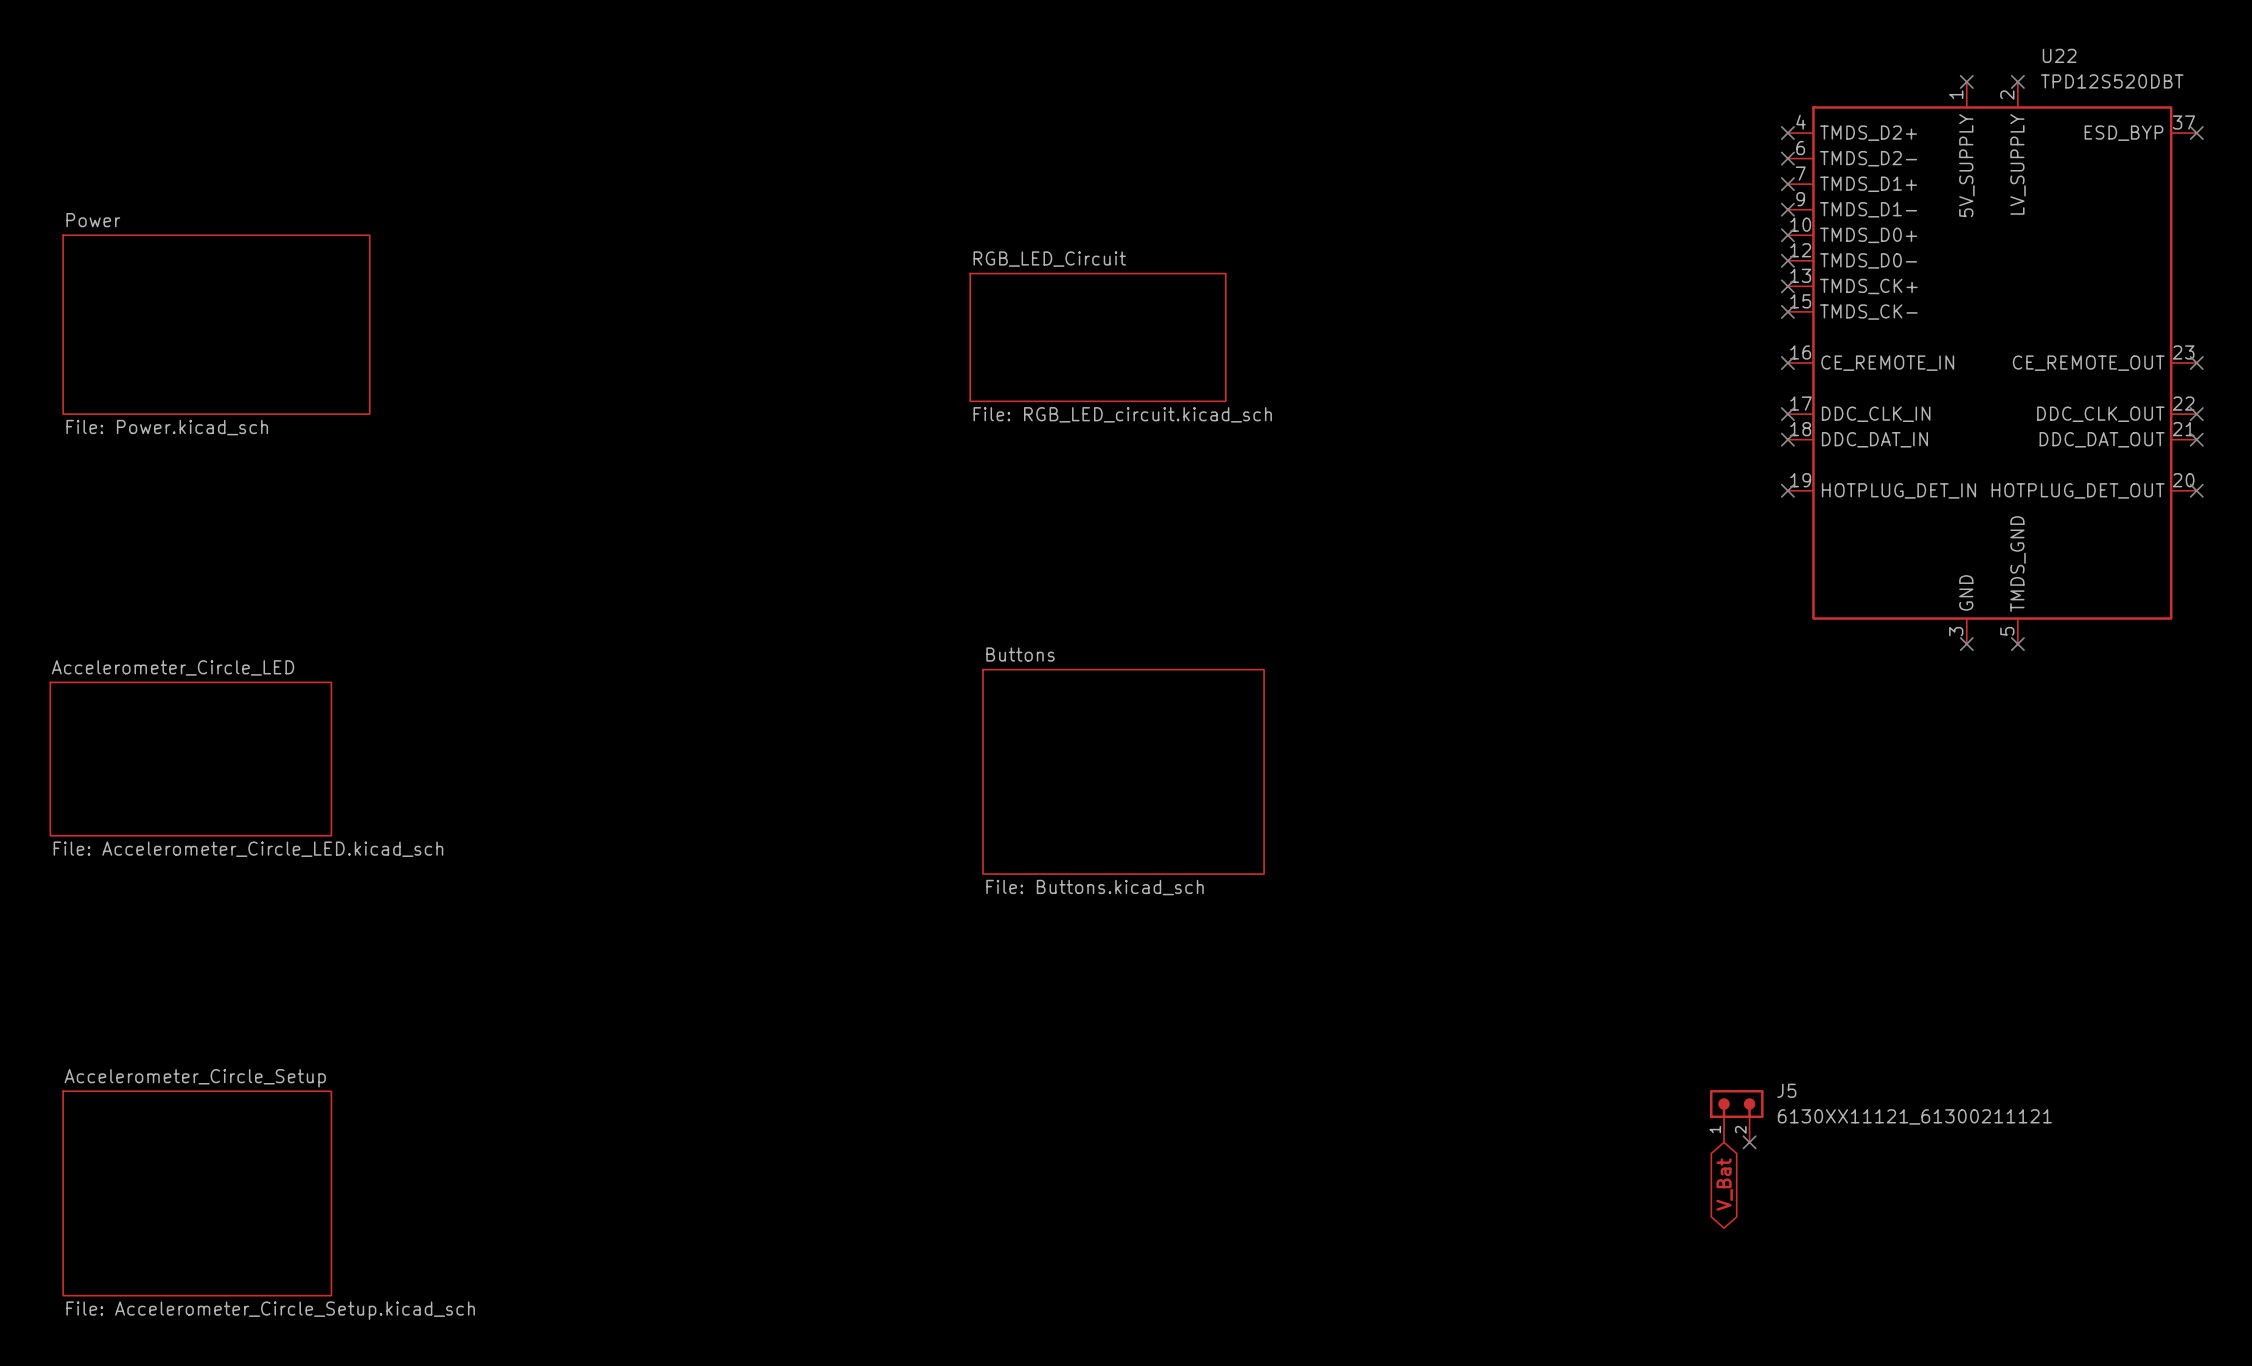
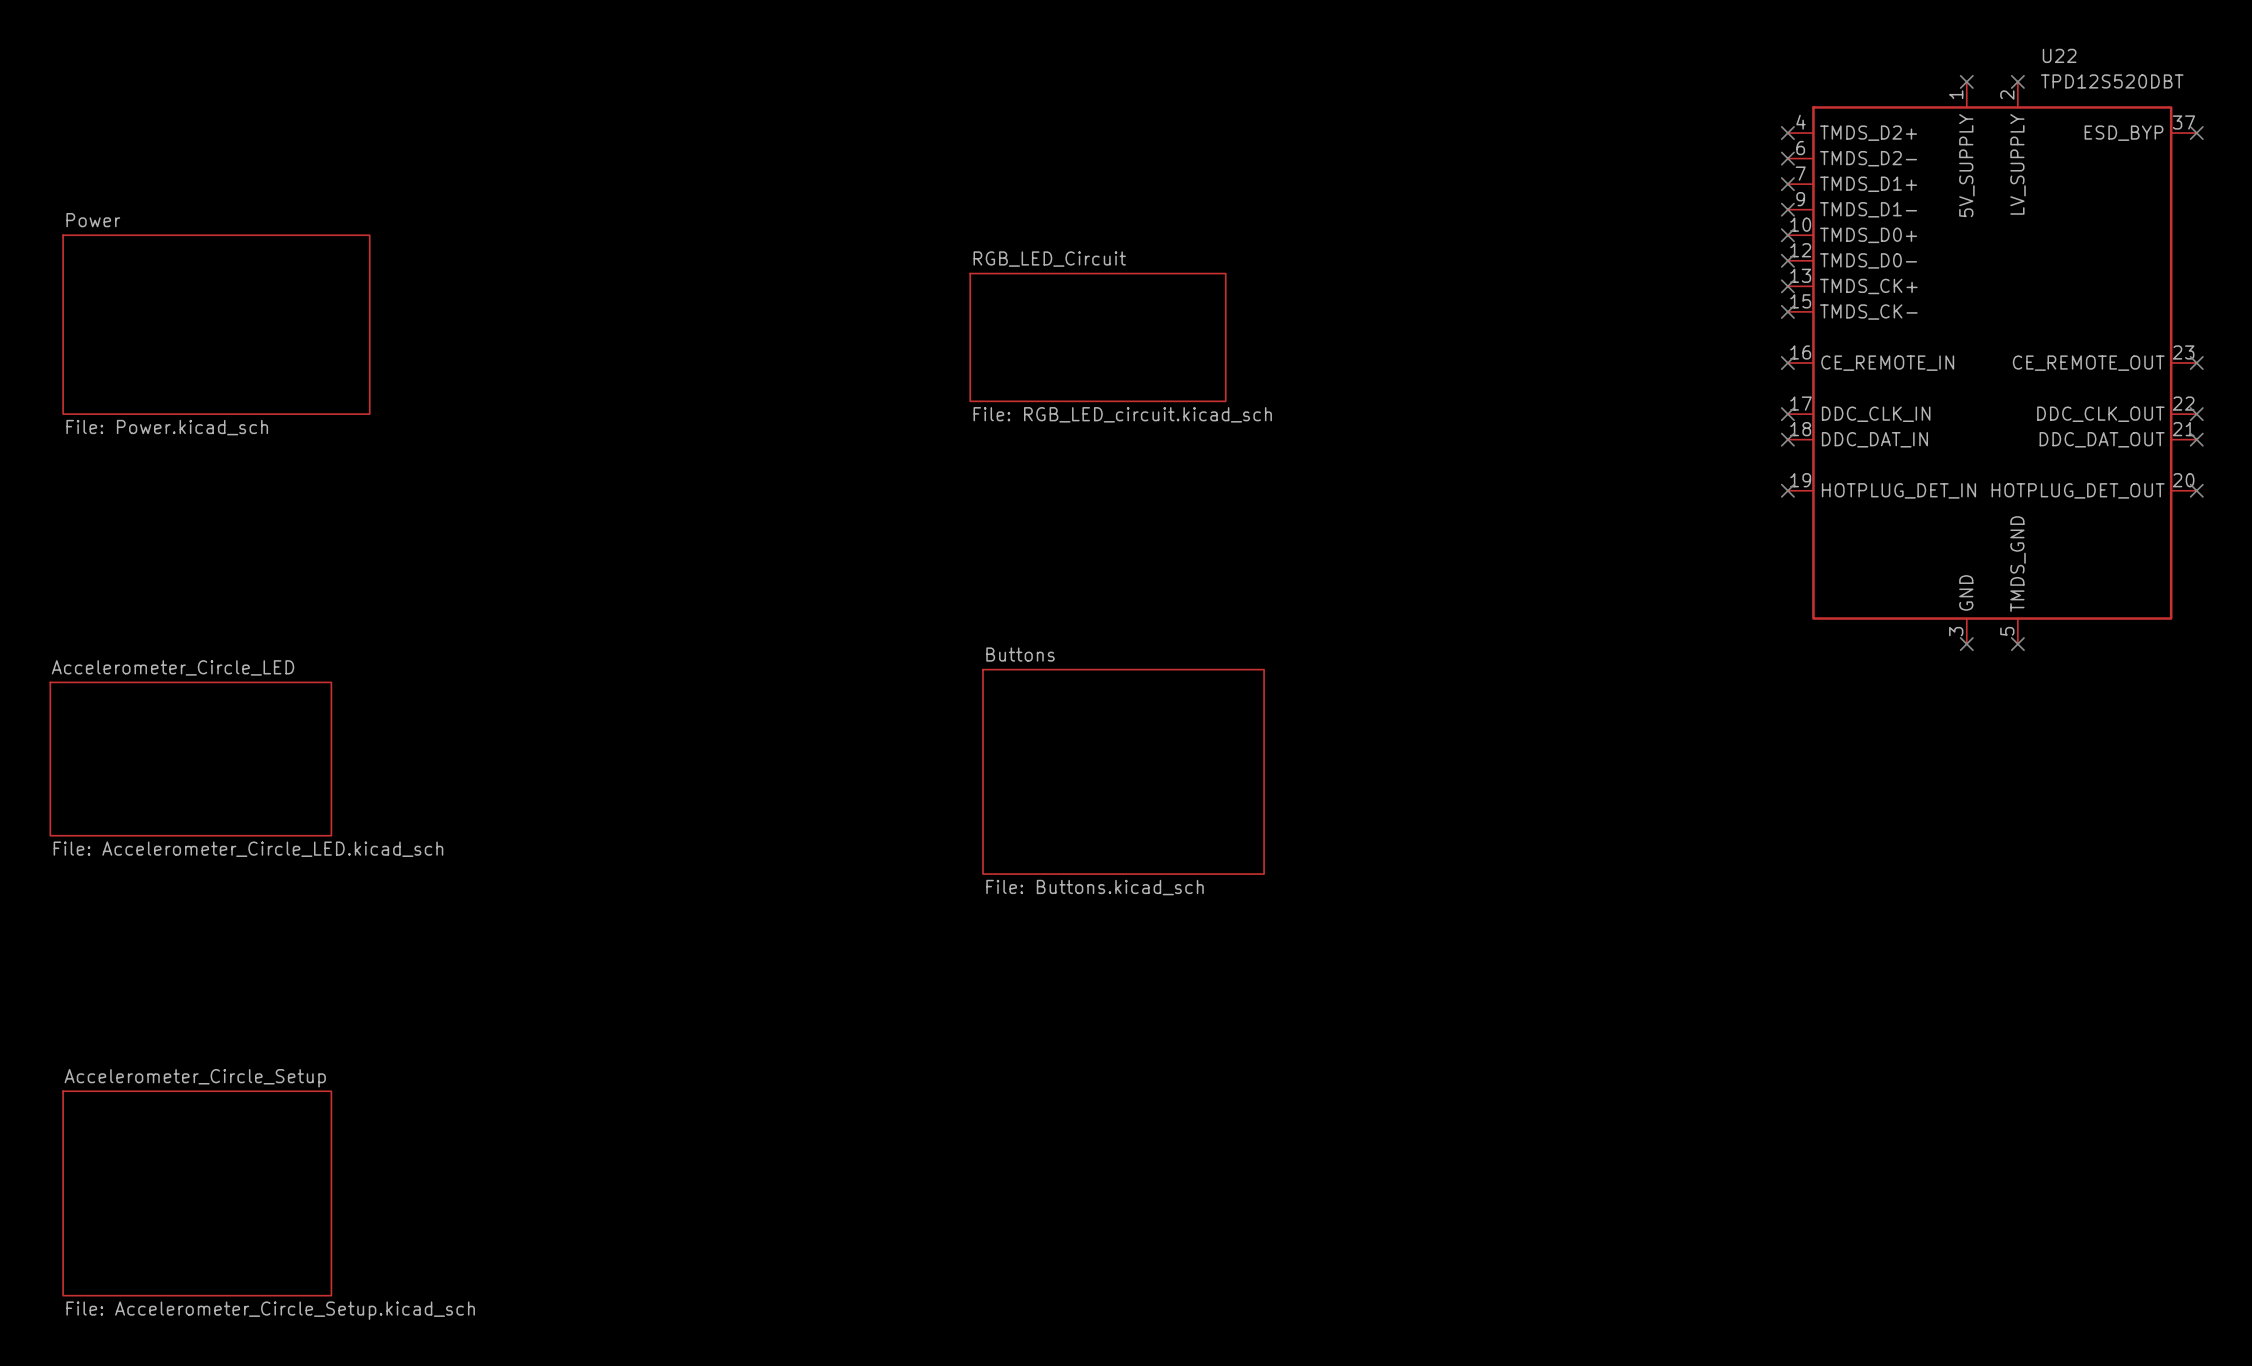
J5: 6130XX11121_61300211121 (1736, 1116) -> none
no-connect mark: (1749, 1142) -> none
global label: V_Bat (1724, 1184) -> none

